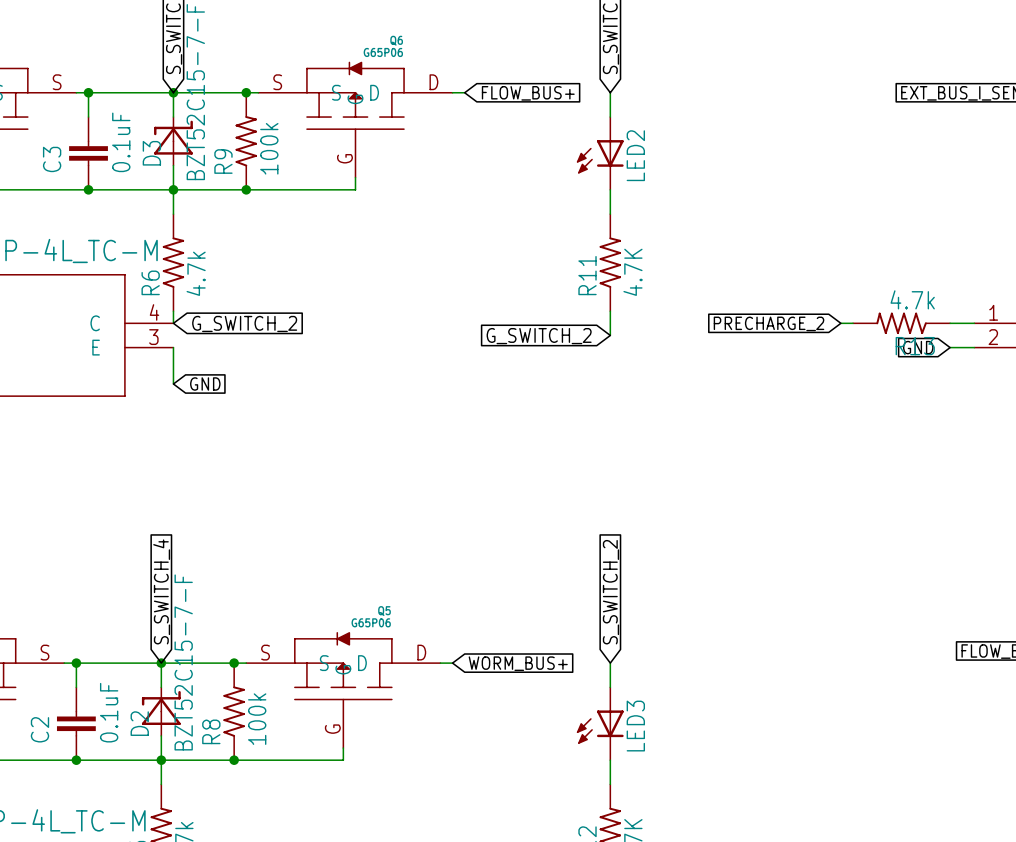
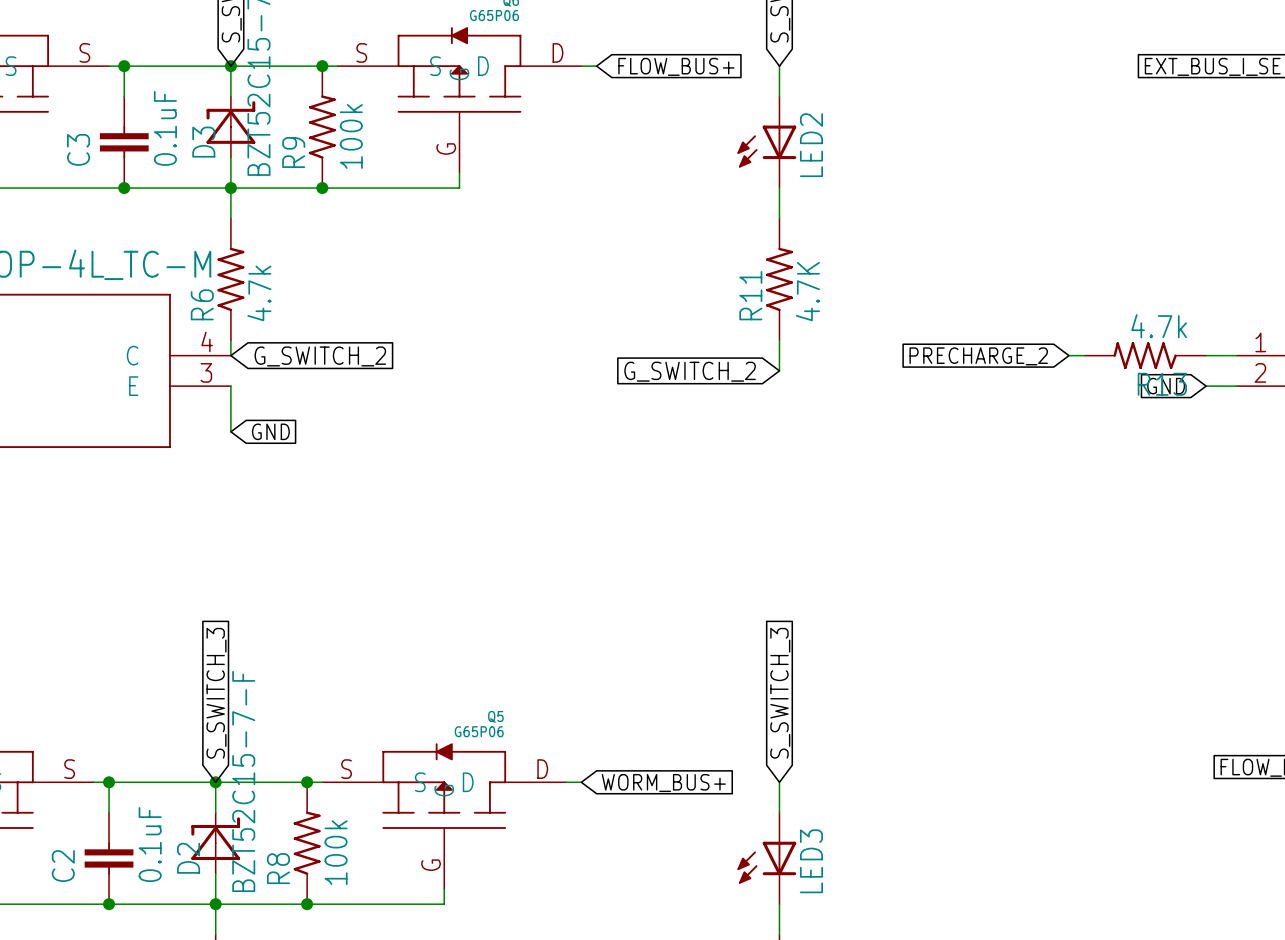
global label: S_SWITCH_4 (161, 591) -> S_SWITCH_3 (216, 693)
global label: S_SWITCH_2 (610, 592) -> S_SWITCH_3 (780, 693)

